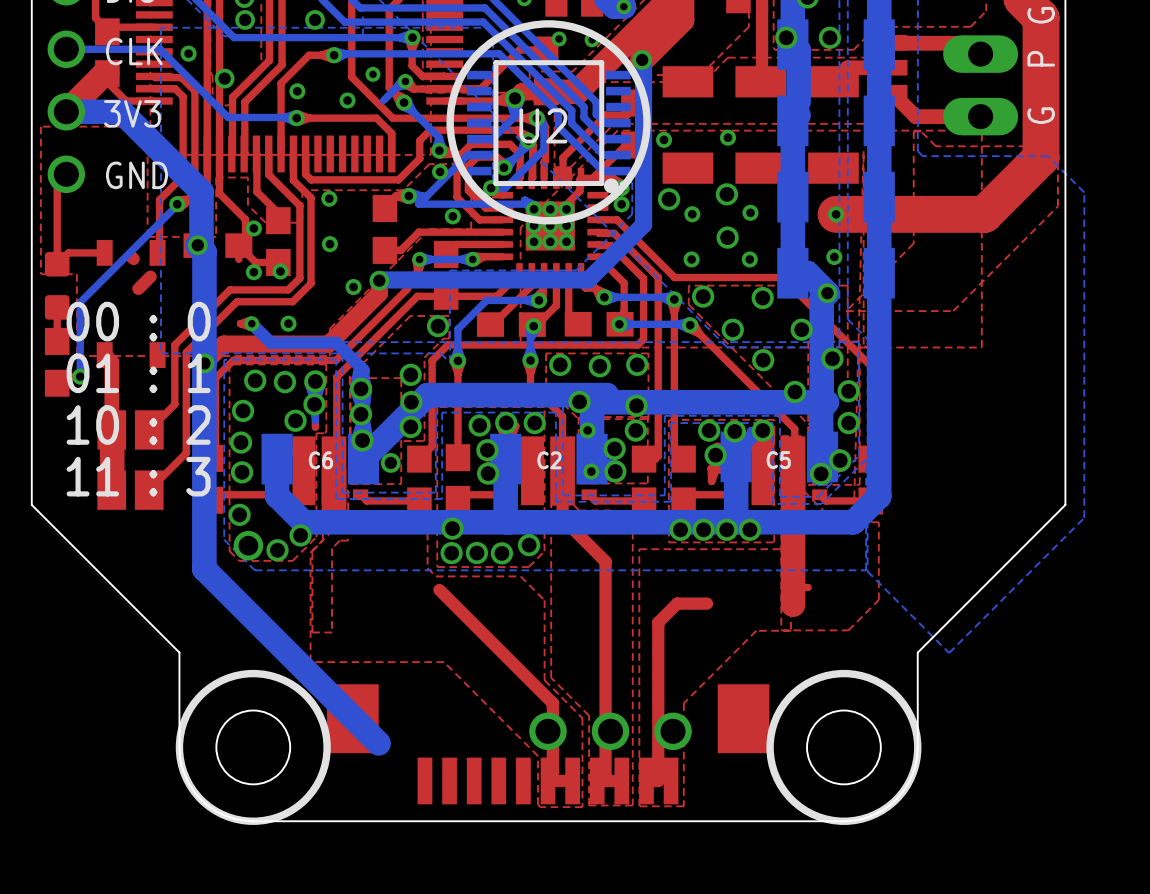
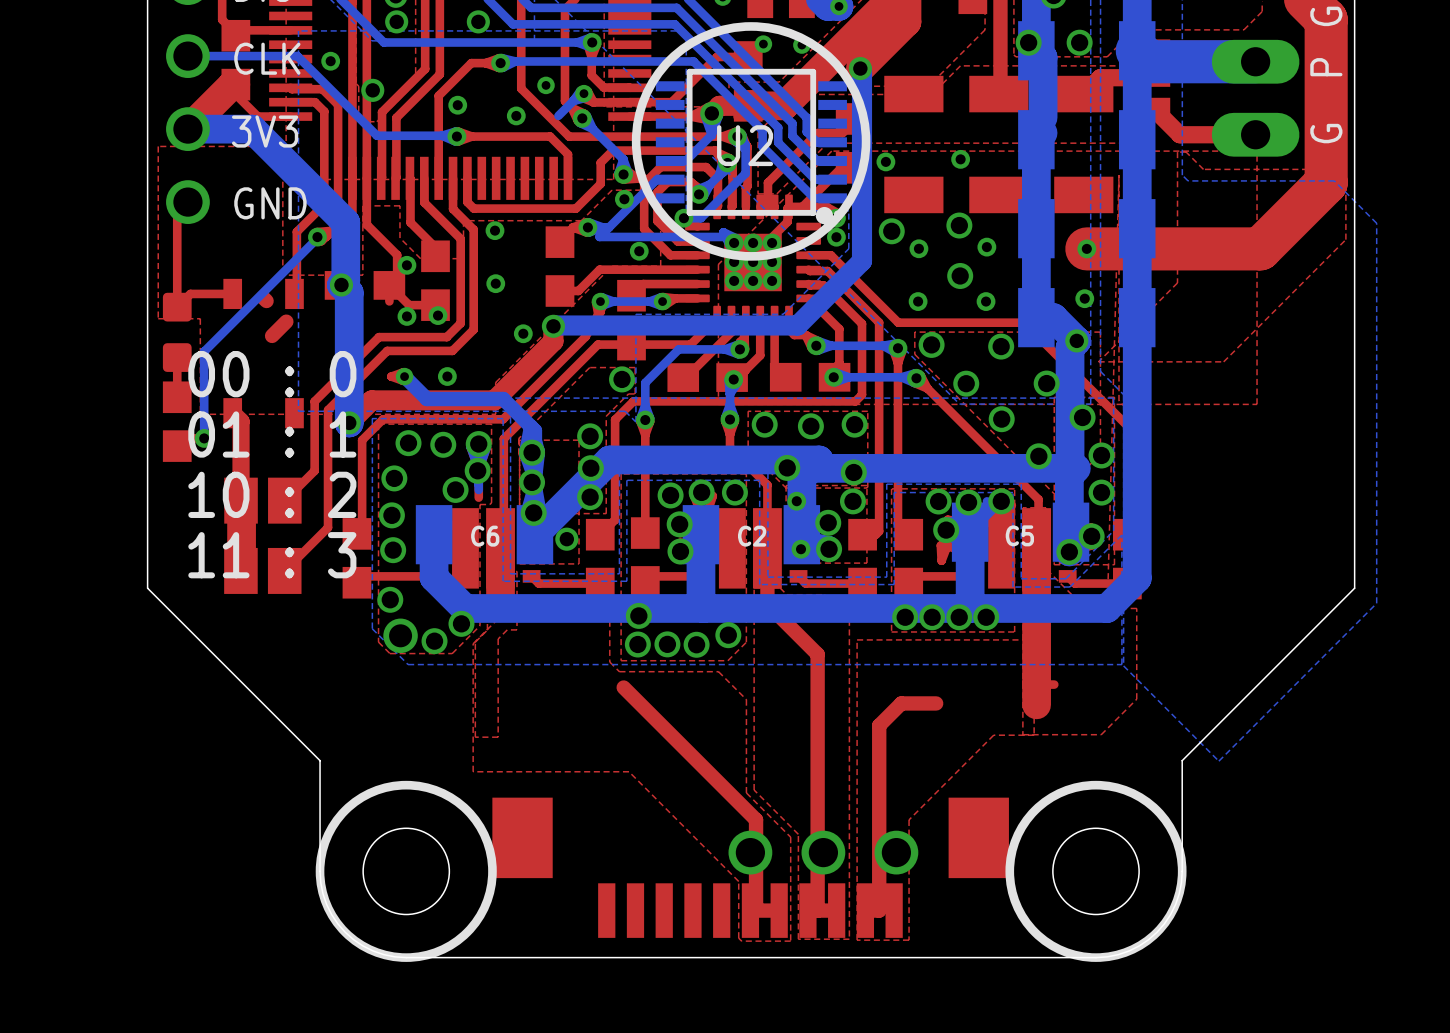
bottom track: none -> (1137, 50) (1148, 61) (1255, 61)
bottom track: (204, 363) (204, 569) (378, 743) -> none

